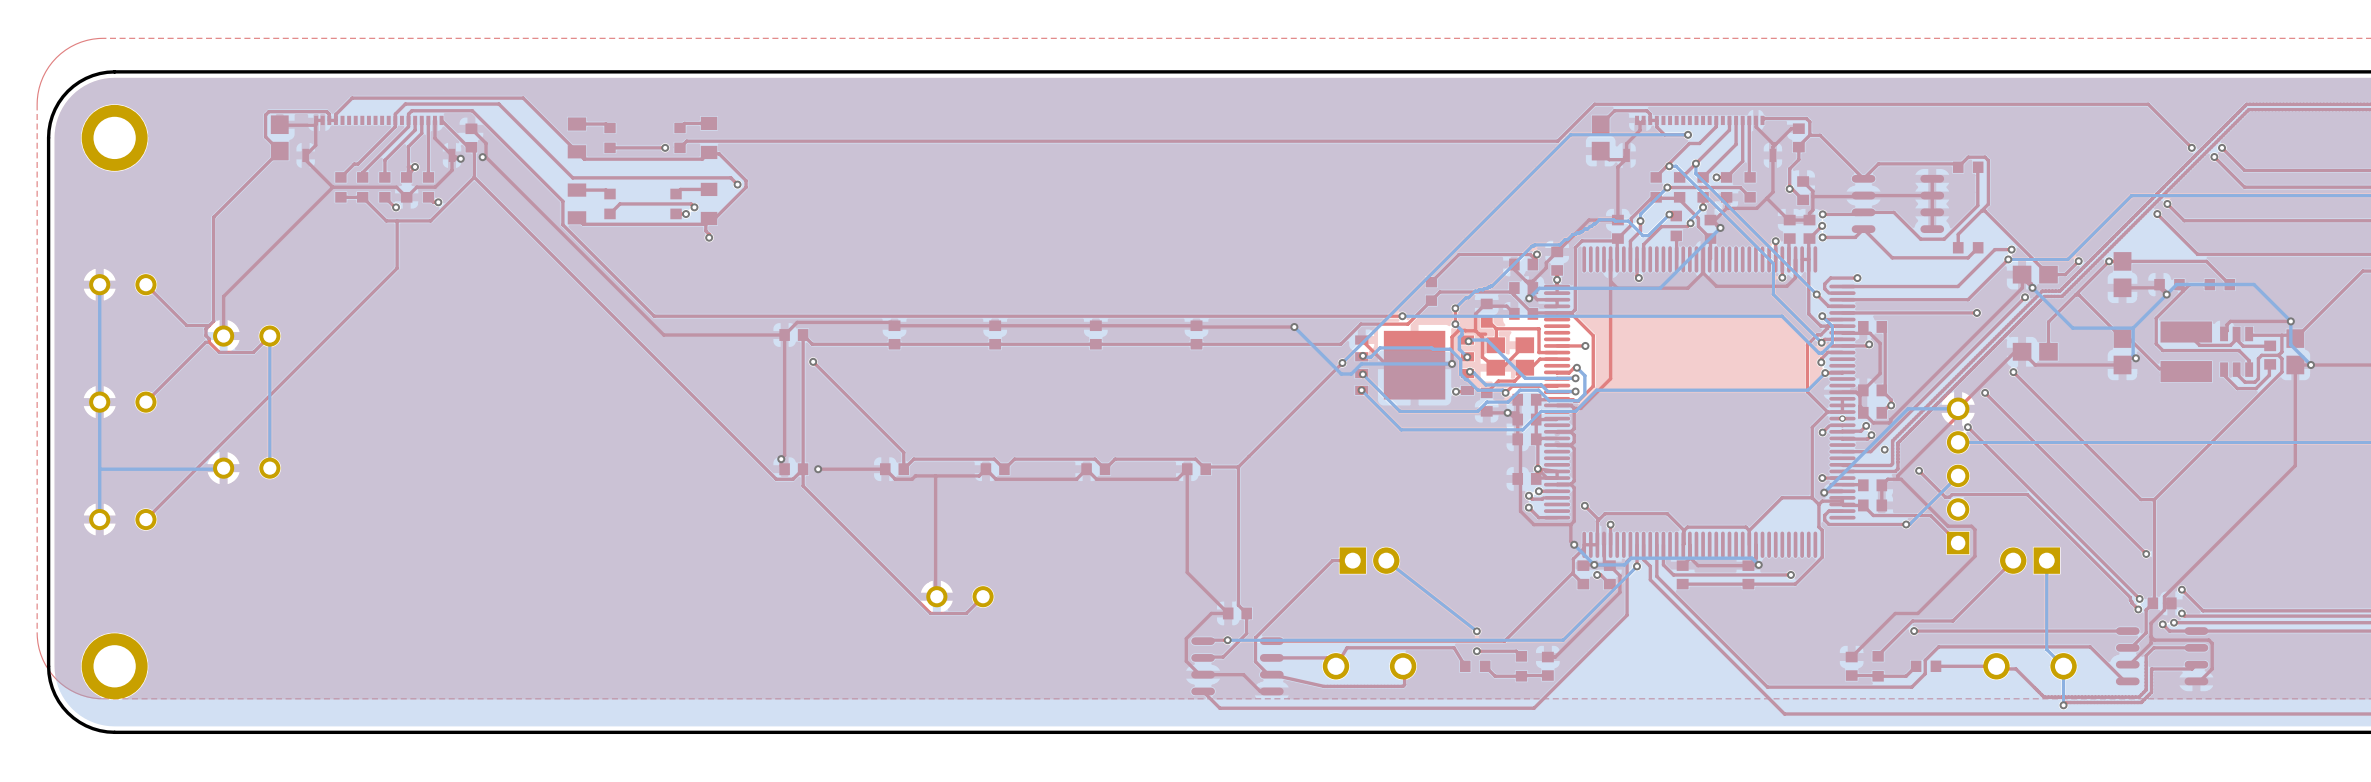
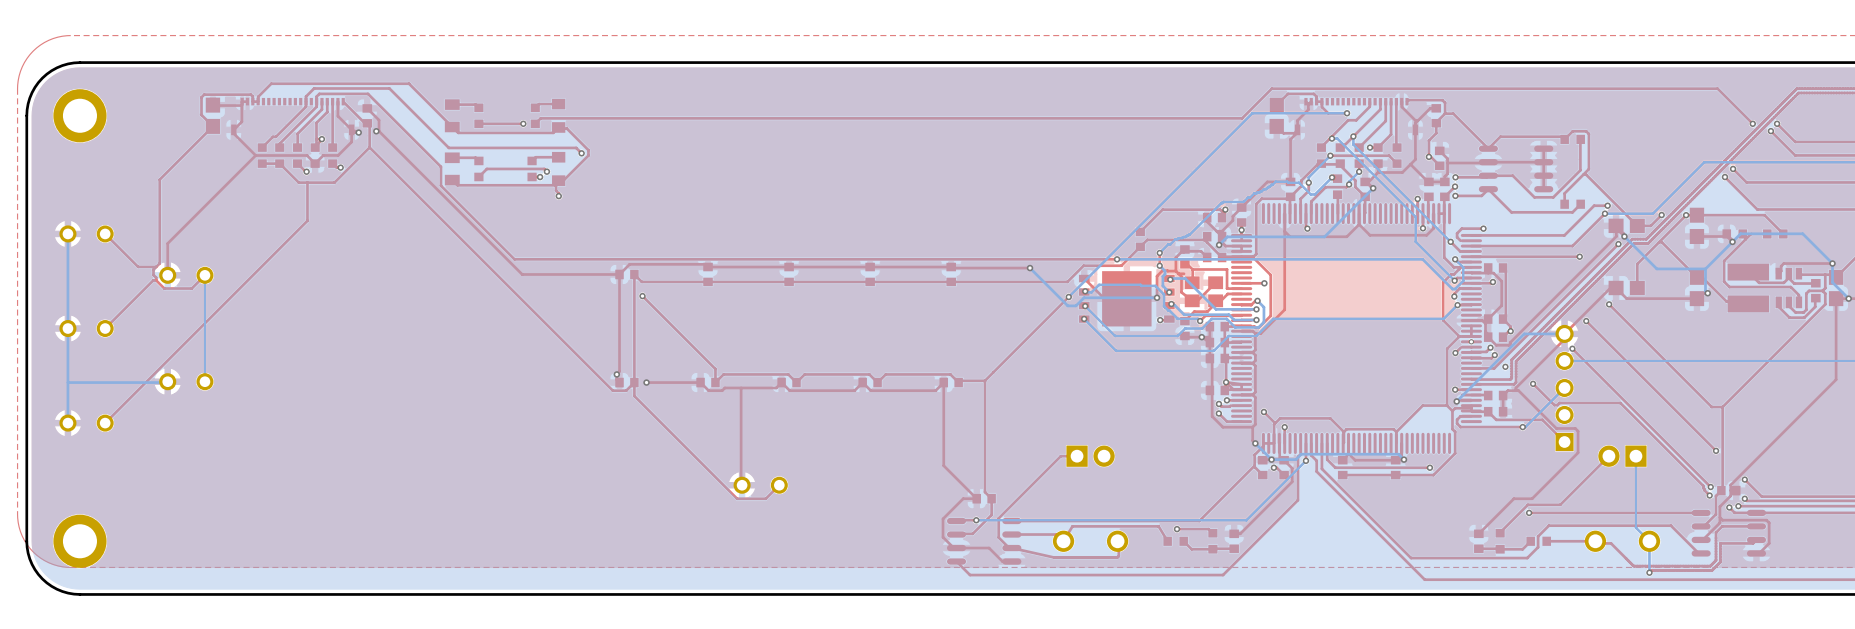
bottom track: (1386, 560) (1476, 631) -> none
via: (1476, 631) -> none

